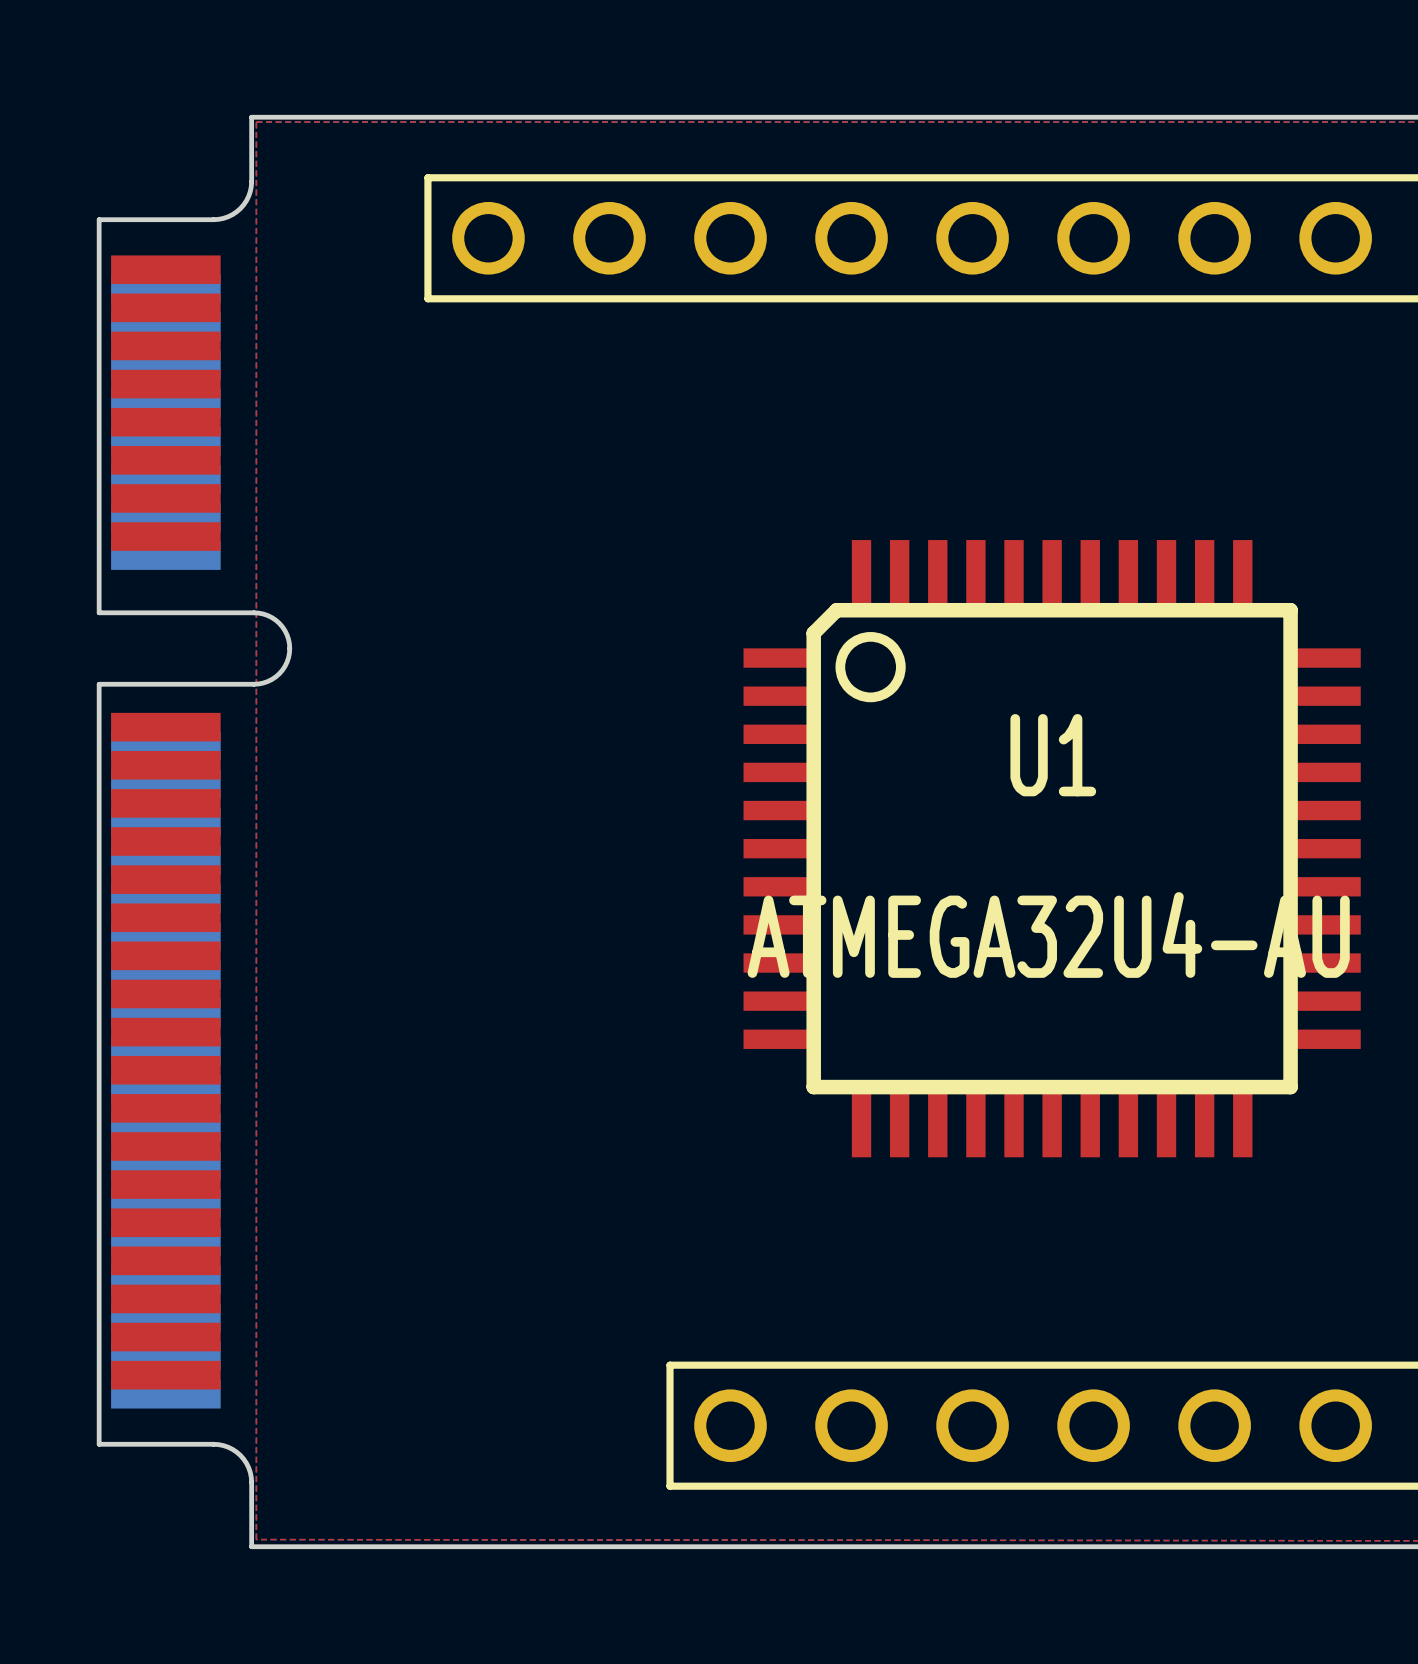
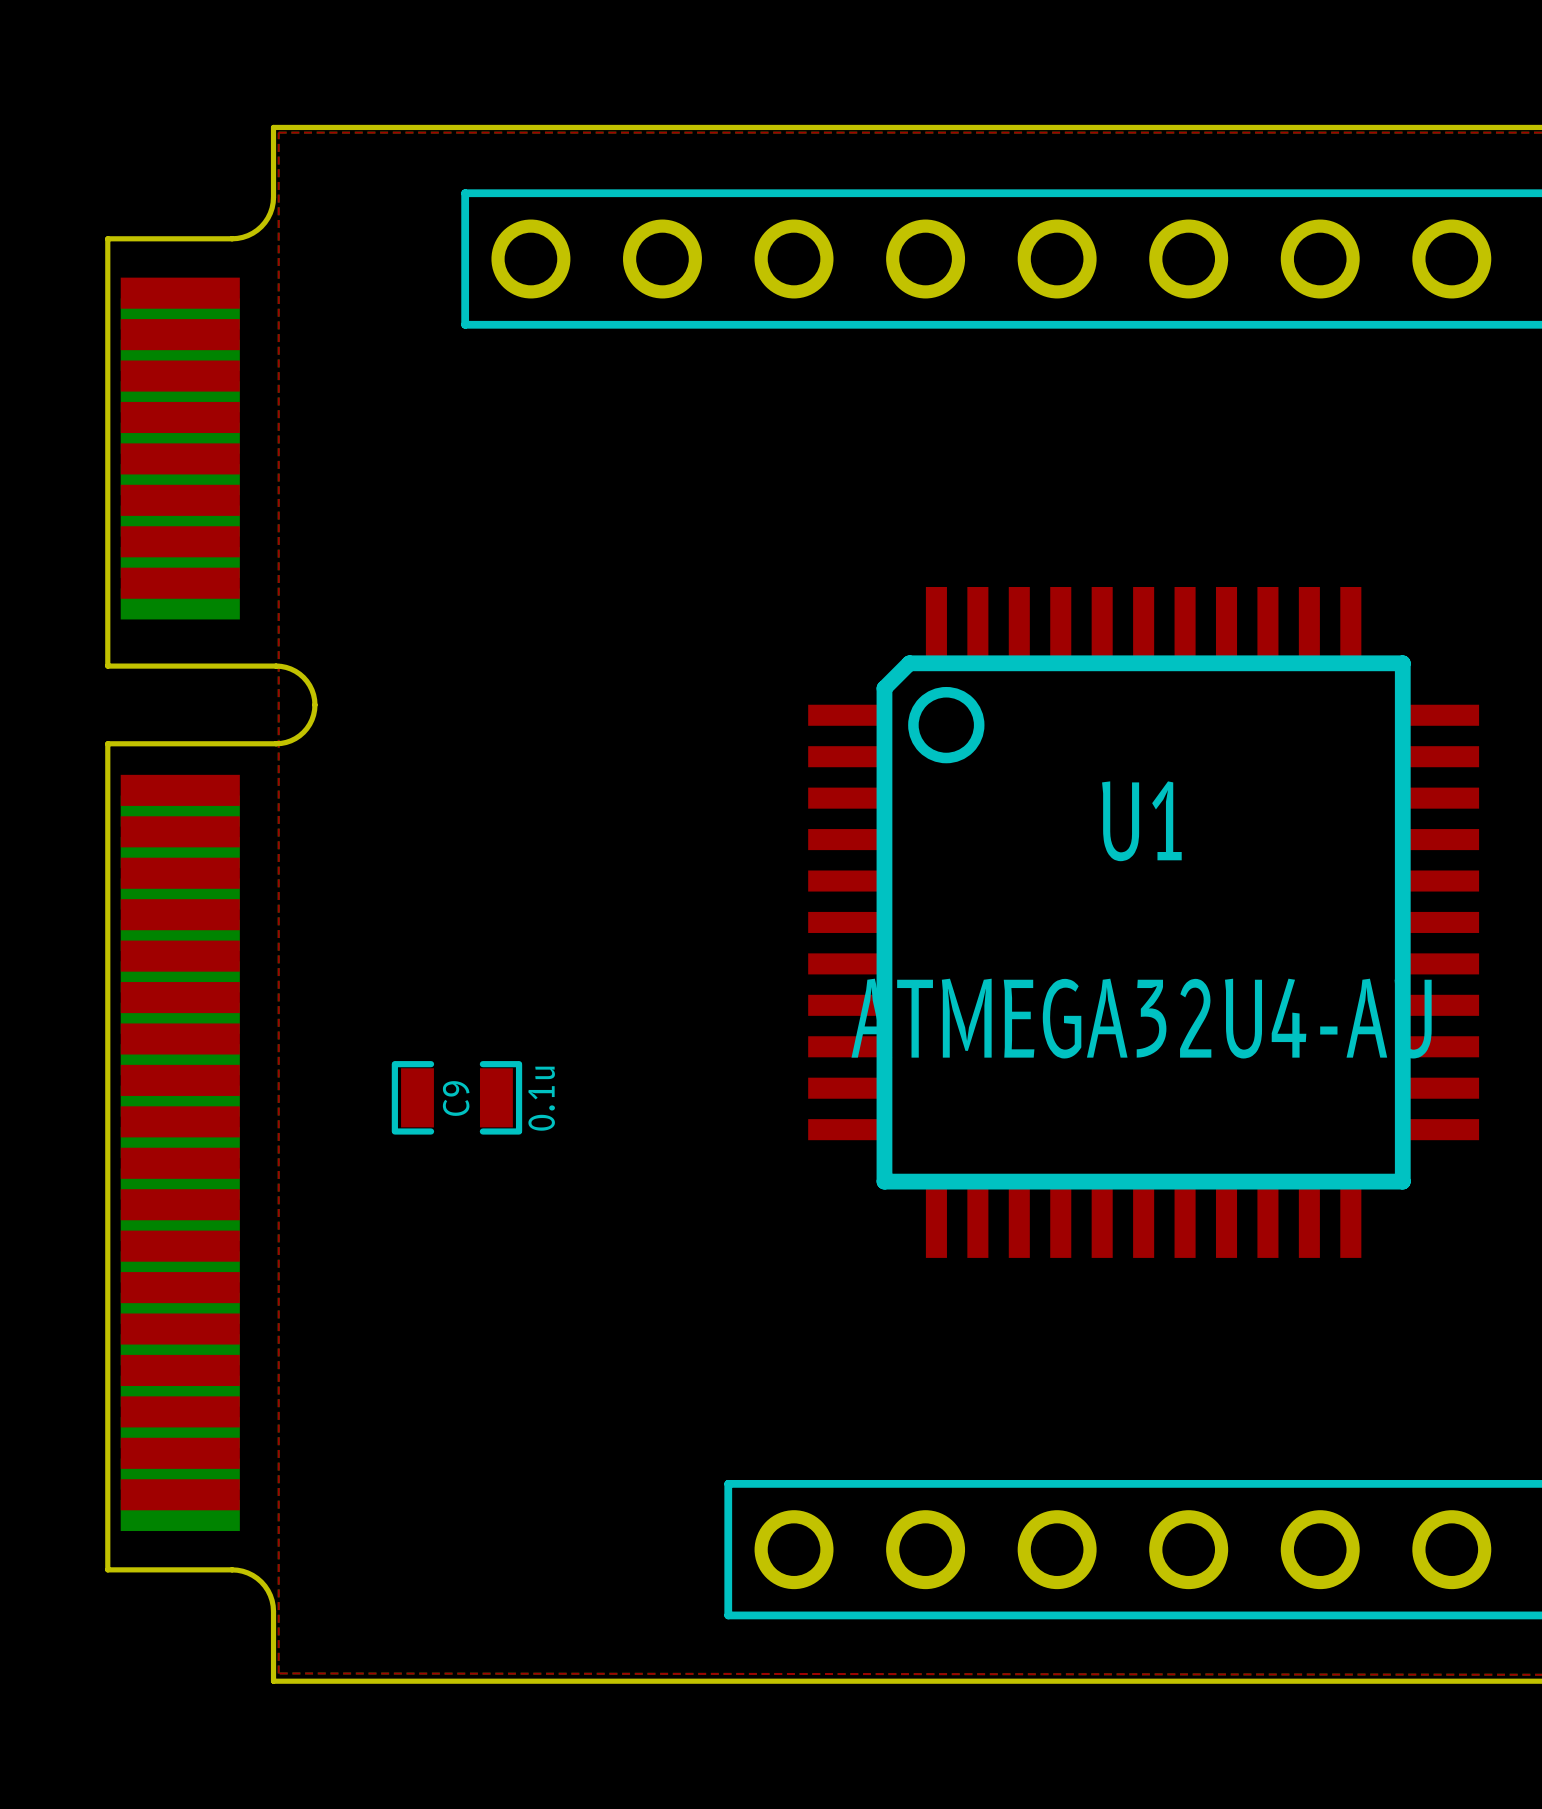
C9: none -> 0.1u (456, 1097)

